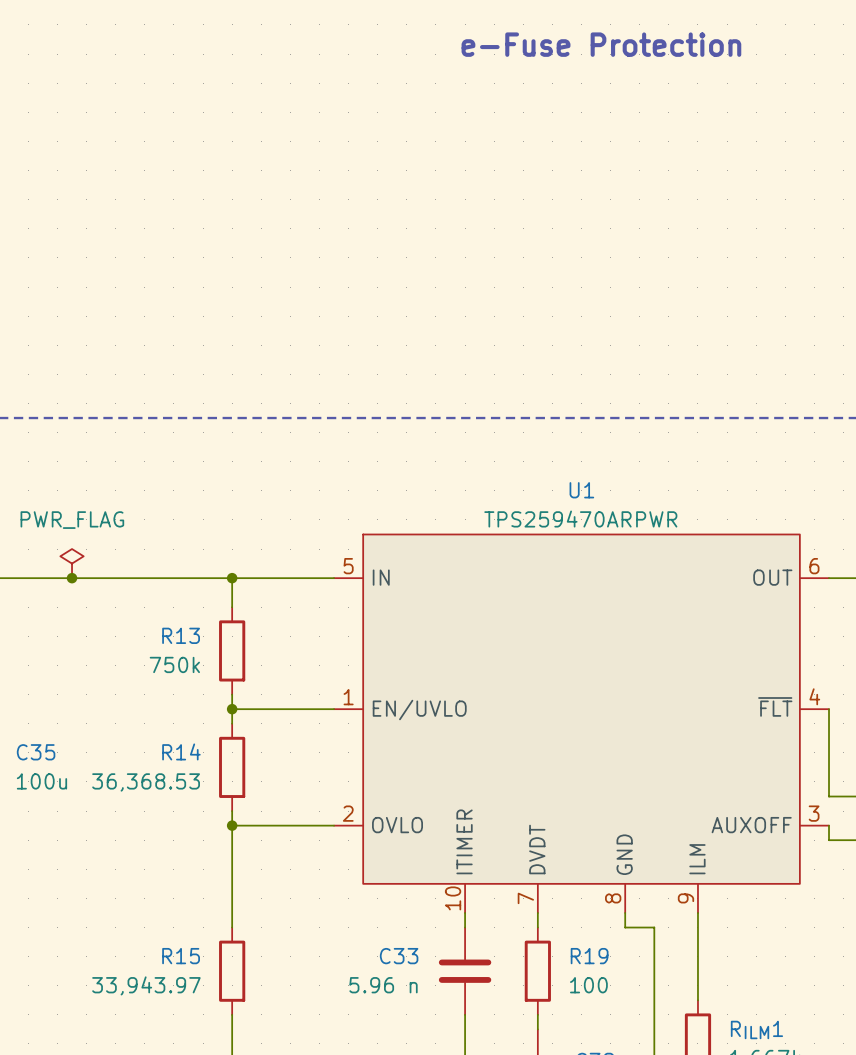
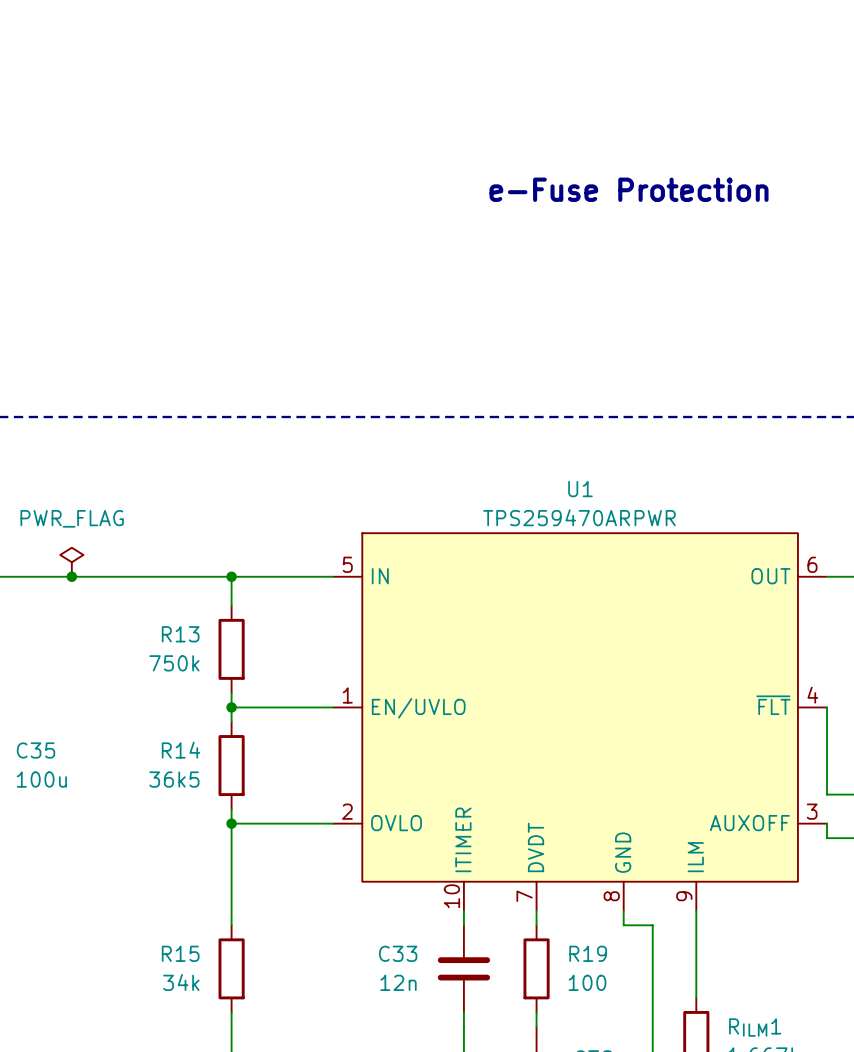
text position: e-Fuse Protection (601, 44) -> e-Fuse Protection (629, 189)
R14 value: 36,368.53 (146, 782) -> 36k5 (174, 779)
R15 value: 33,943.97 (146, 985) -> 34k (181, 982)
C33 value: 5.96 n (383, 985) -> 12n (398, 982)

